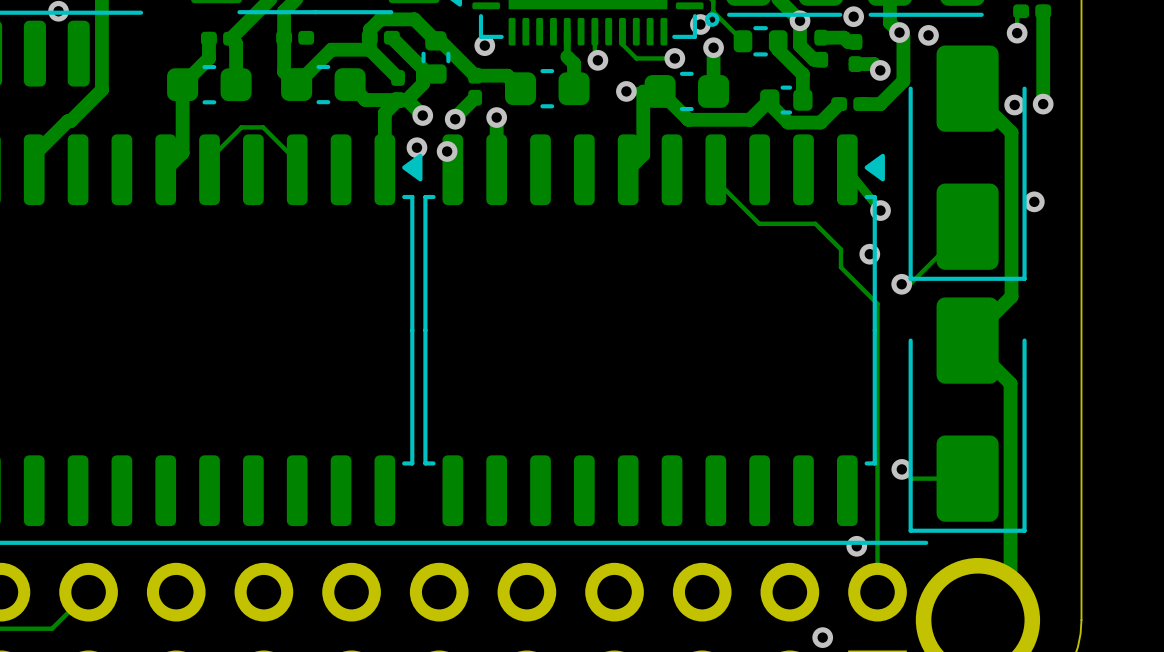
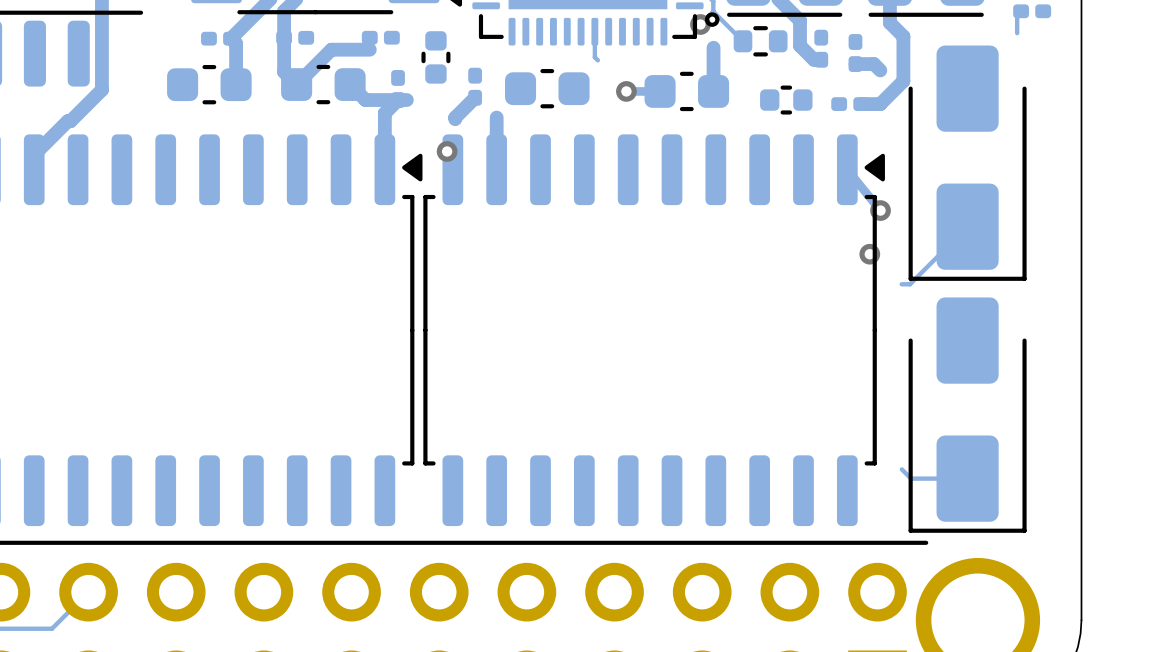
via: (58, 11) -> none
track: (1043, 11) (1043, 104) -> none
via: (853, 16) -> none
via: (800, 20) -> none
track: (567, 31) (567, 56) (574, 63) (574, 88) -> none
track: (622, 31) (622, 44) (636, 58) (674, 58) -> none
via: (899, 32) -> none
via: (1017, 33) -> none
via: (928, 35) -> none
track: (391, 37) (422, 68) (422, 83) (407, 99) (422, 115) -> none
track: (821, 37) (843, 37) (848, 41) (855, 41) -> none
track: (208, 38) (208, 58) (182, 84) (182, 152) (165, 169) -> none
track: (778, 41) (778, 49) (802, 74) (802, 100) -> none
via: (484, 45) -> none
via: (713, 47) -> none
via: (674, 58) -> none
via: (597, 60) -> none
via: (880, 70) -> none
track: (398, 77) (369, 49) (369, 29) (380, 19) (414, 19) (435, 40) (440, 40) (475, 75) (507, 75) (520, 88) -> none
track: (967, 88) (1011, 132) (1011, 296) (967, 340) (1010, 383) (1010, 587) (977, 620) -> none
track: (643, 91) (643, 154) (628, 169) -> none
track: (660, 91) (688, 119) (750, 119) (769, 100) -> none
track: (767, 102) (788, 122) (820, 122) (839, 104) -> none
via: (1043, 104) -> none
via: (1014, 105) -> none
via: (422, 115) -> none
via: (496, 117) -> none
via: (455, 119) -> none
via: (416, 147) -> none
track: (297, 169) (297, 161) (263, 127) (241, 127) (209, 159) (209, 169) -> none
track: (715, 169) (715, 180) (759, 223) (815, 223) (840, 249) (840, 267) (877, 303) (877, 592) -> none
via: (1034, 201) -> none
via: (901, 284) -> none
via: (901, 469) -> none
via: (856, 546) -> none
via: (822, 637) -> none

